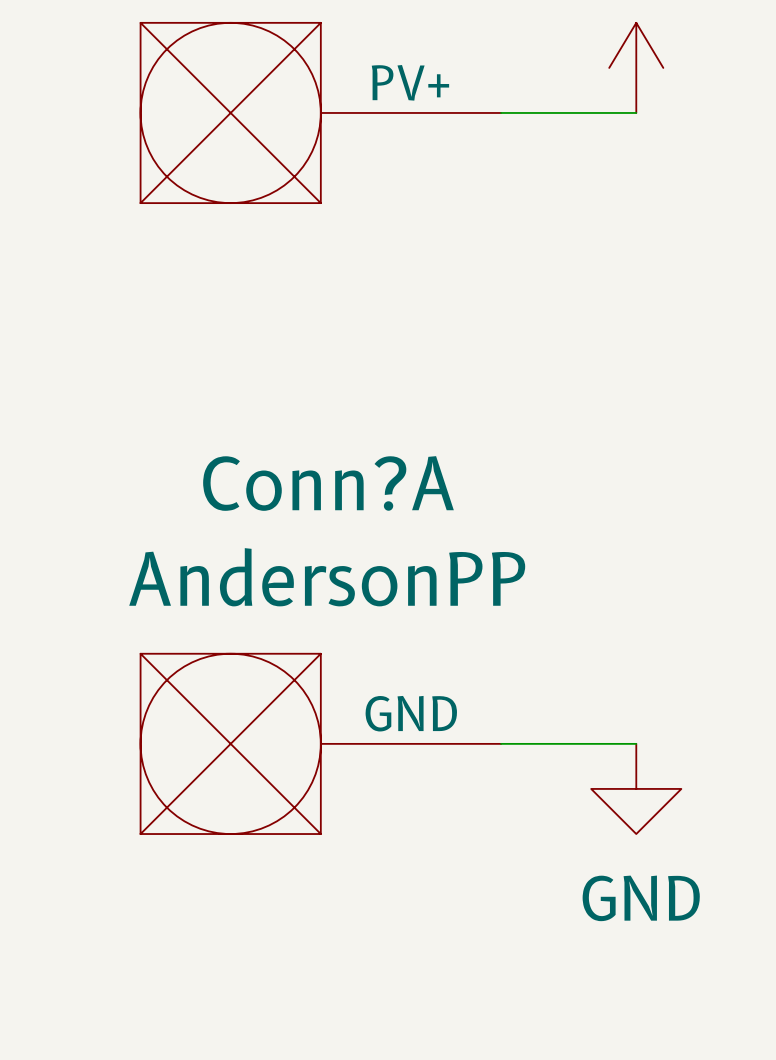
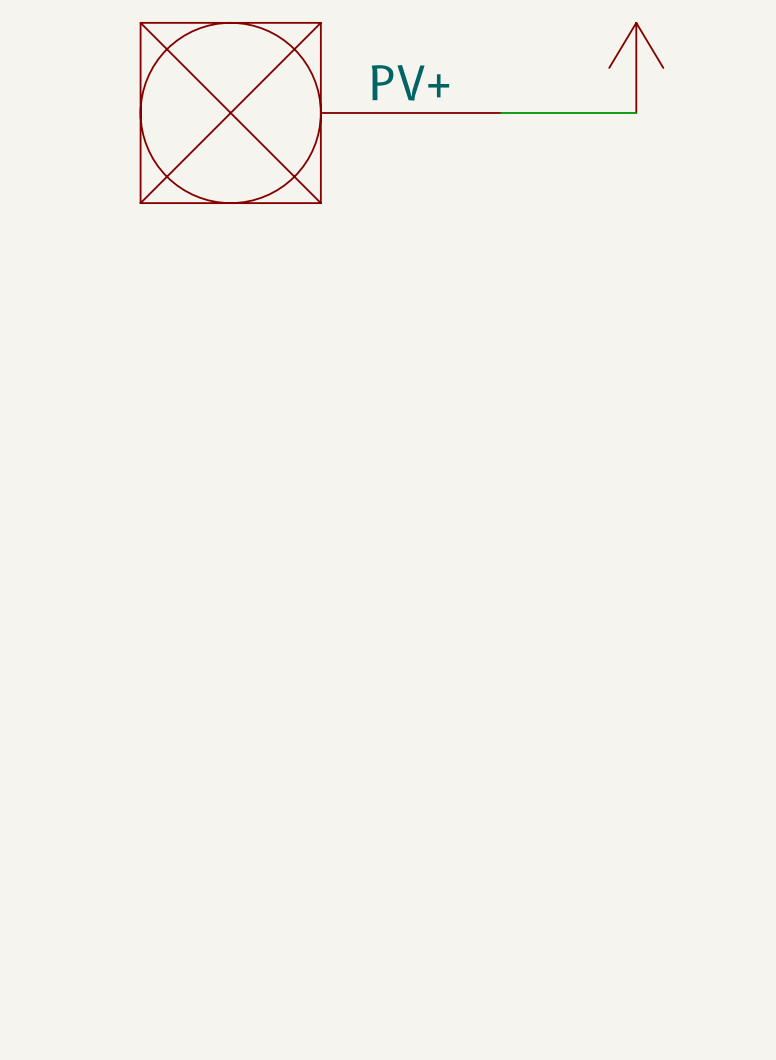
Conn?A: AndersonPP (320, 743) -> none
wire: (501, 743) (636, 743) -> none
power symbol: GND (636, 788) -> none

